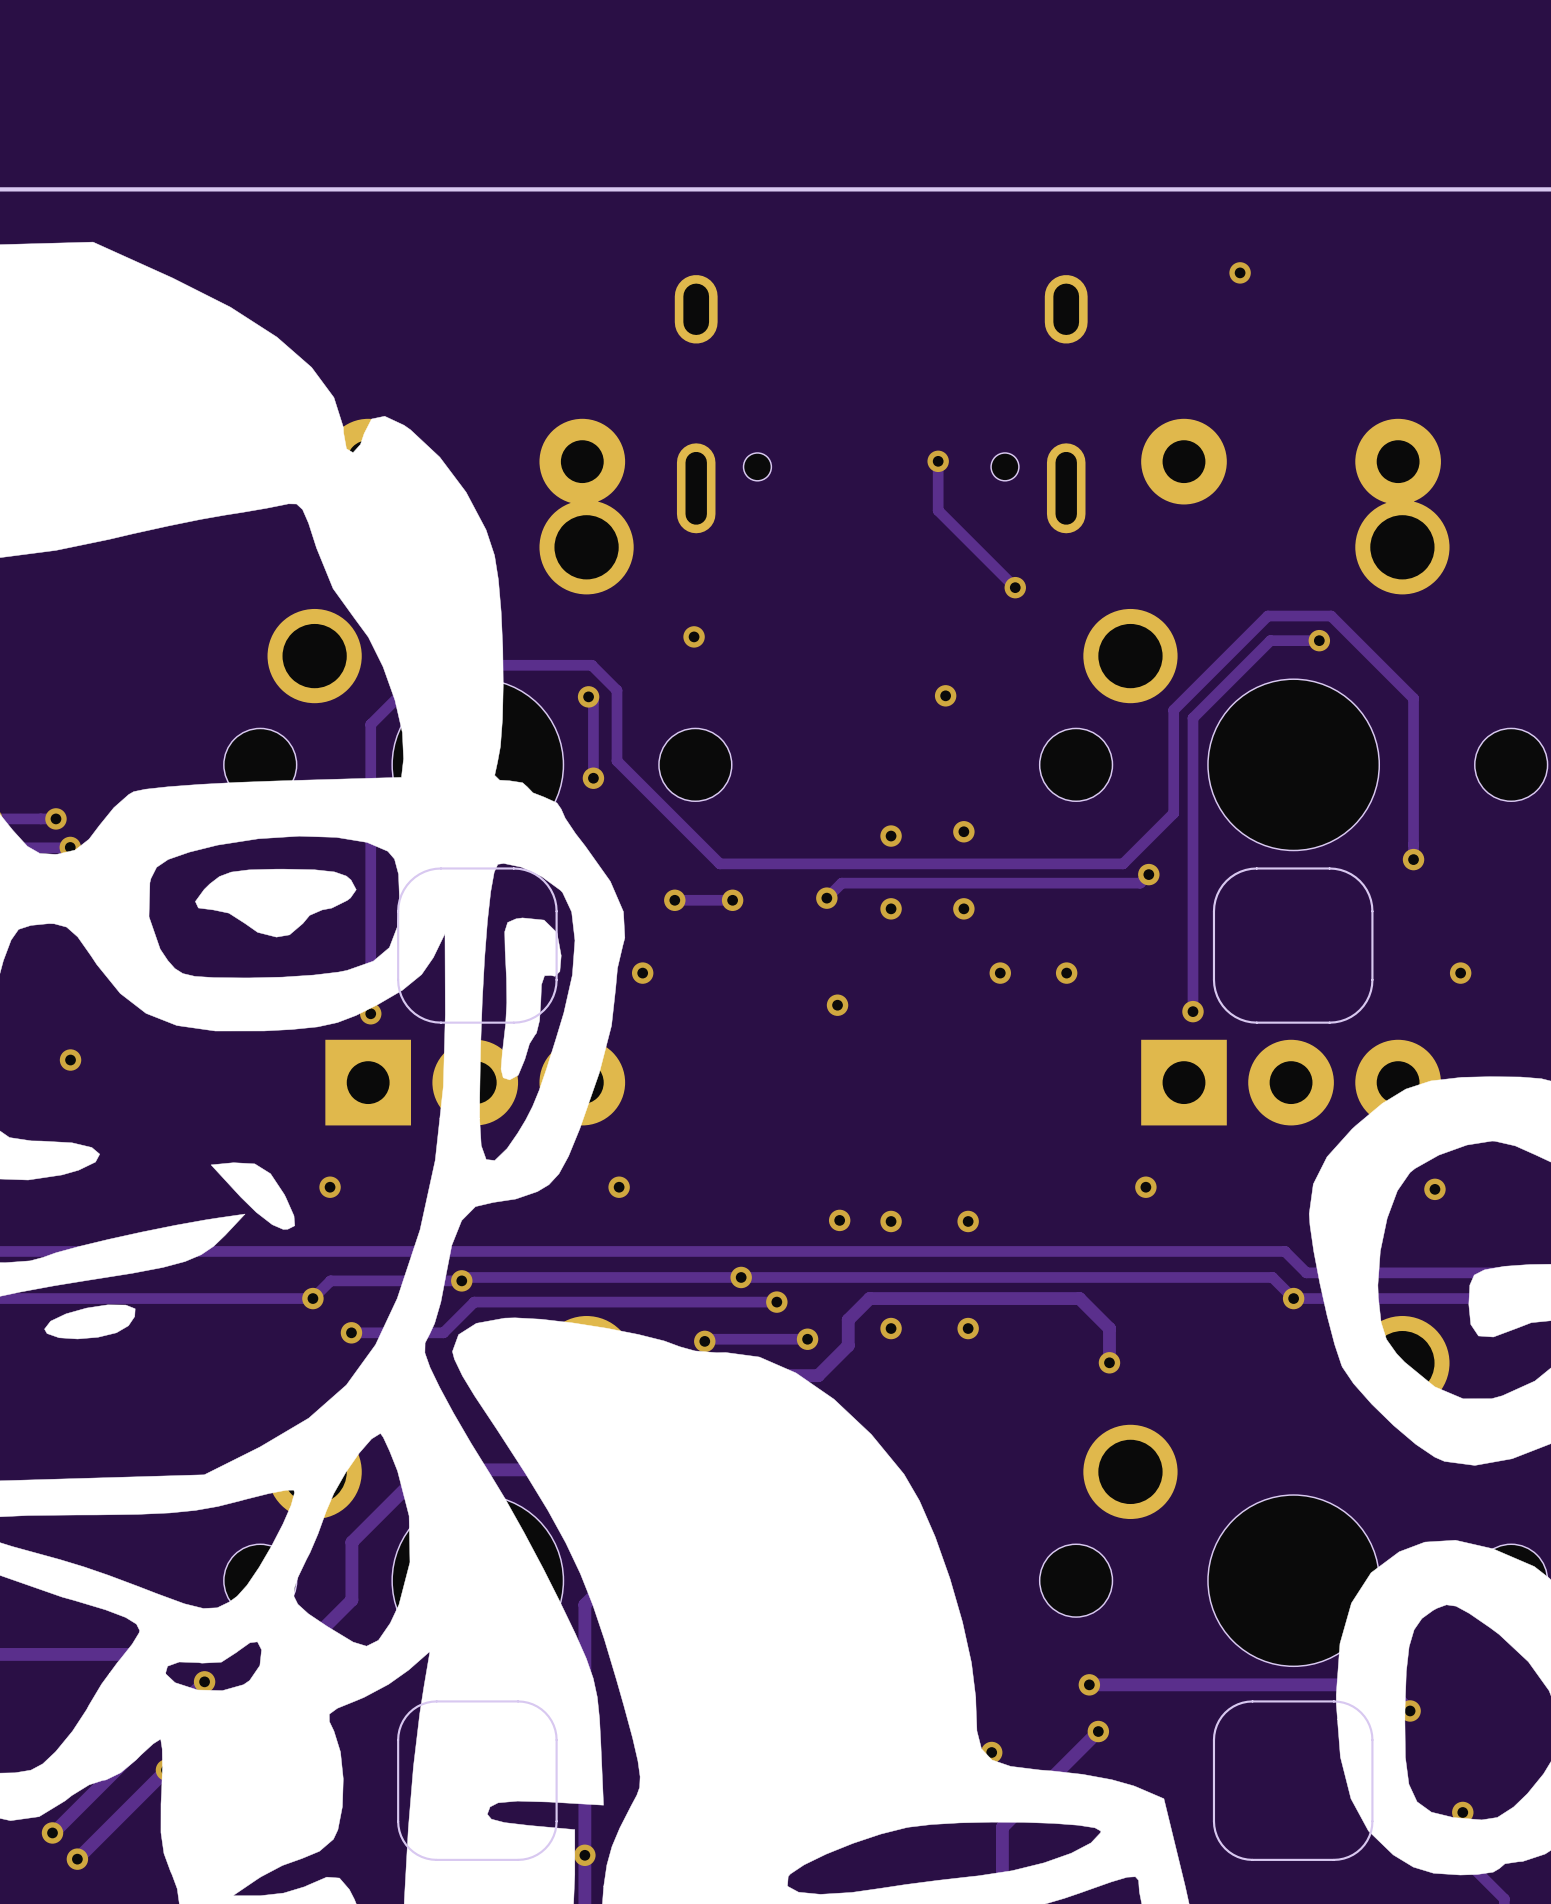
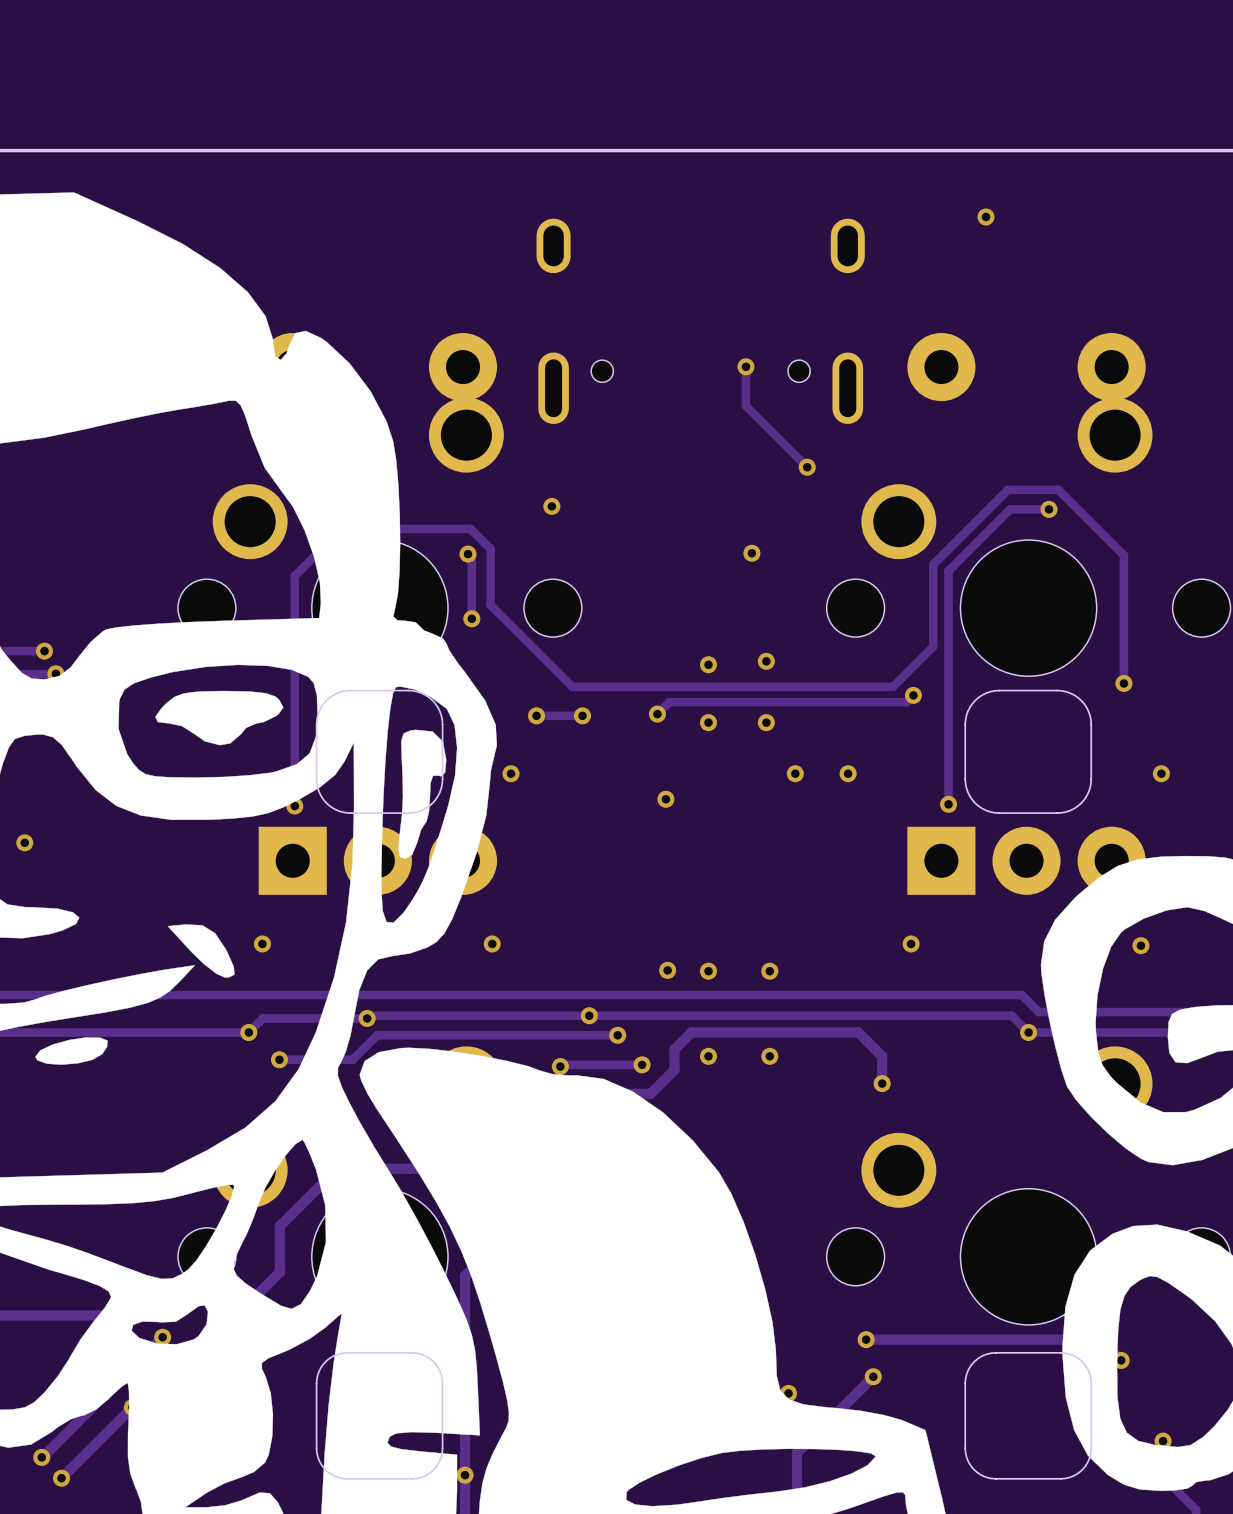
via position: (70, 1060) -> (24, 842)

